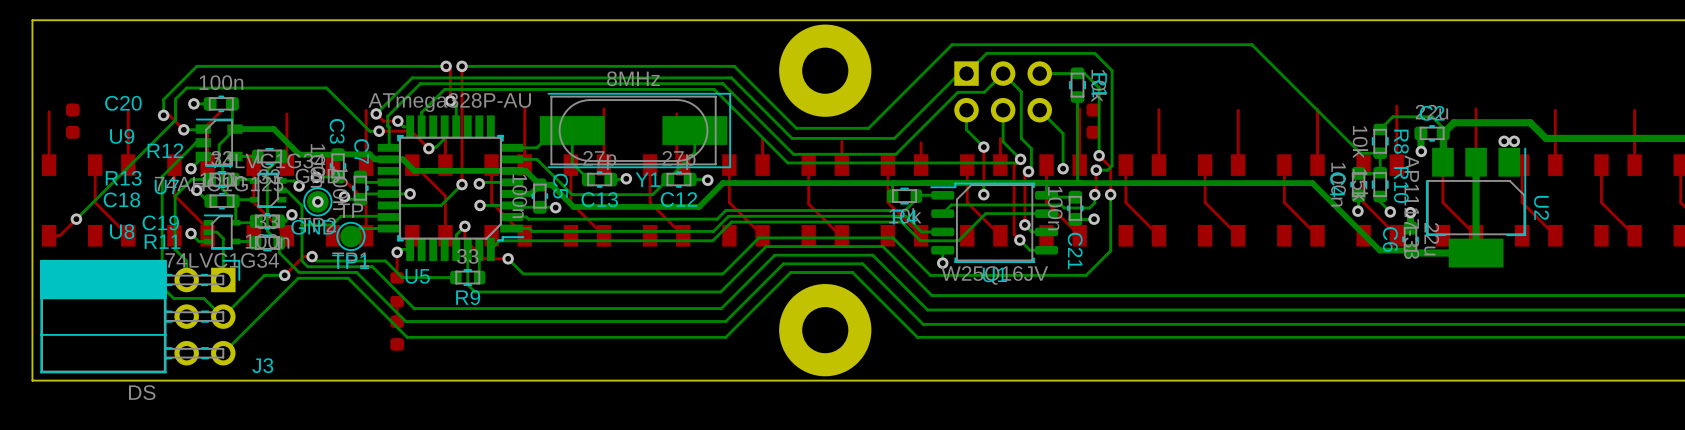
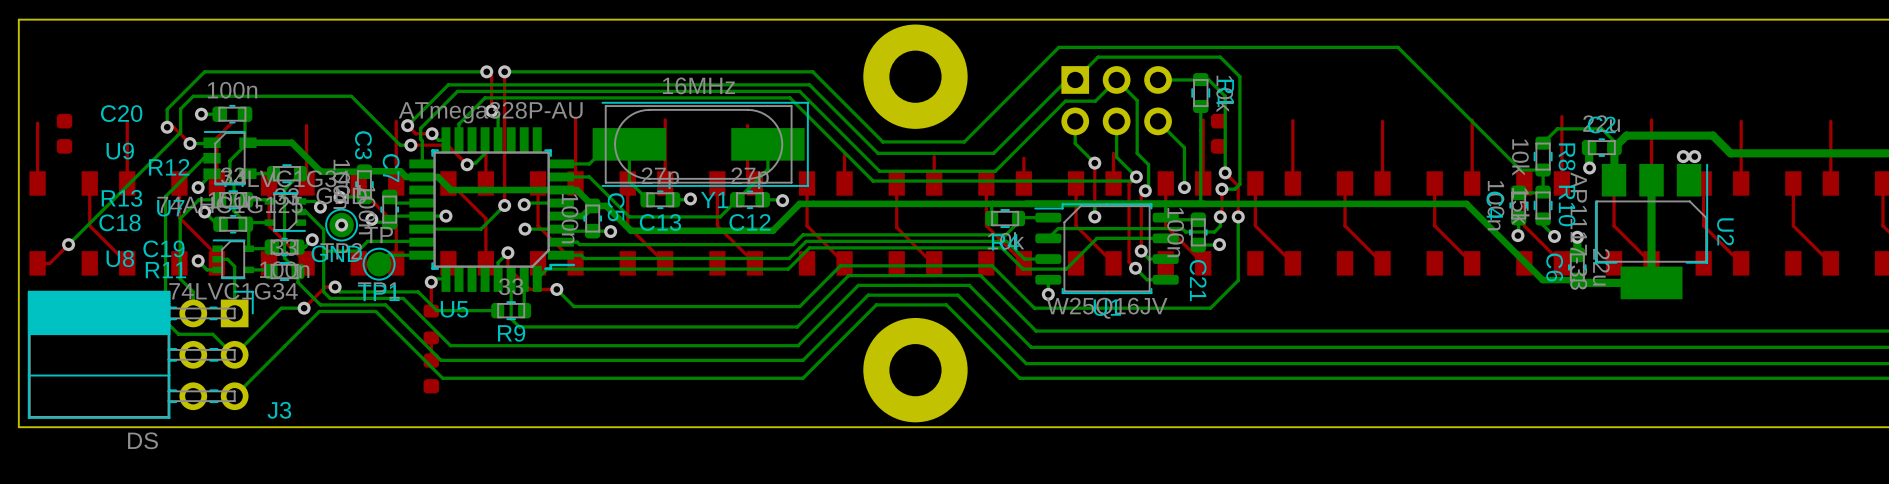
Y1 value: 8MHz (633, 78) -> 16MHz (698, 85)

